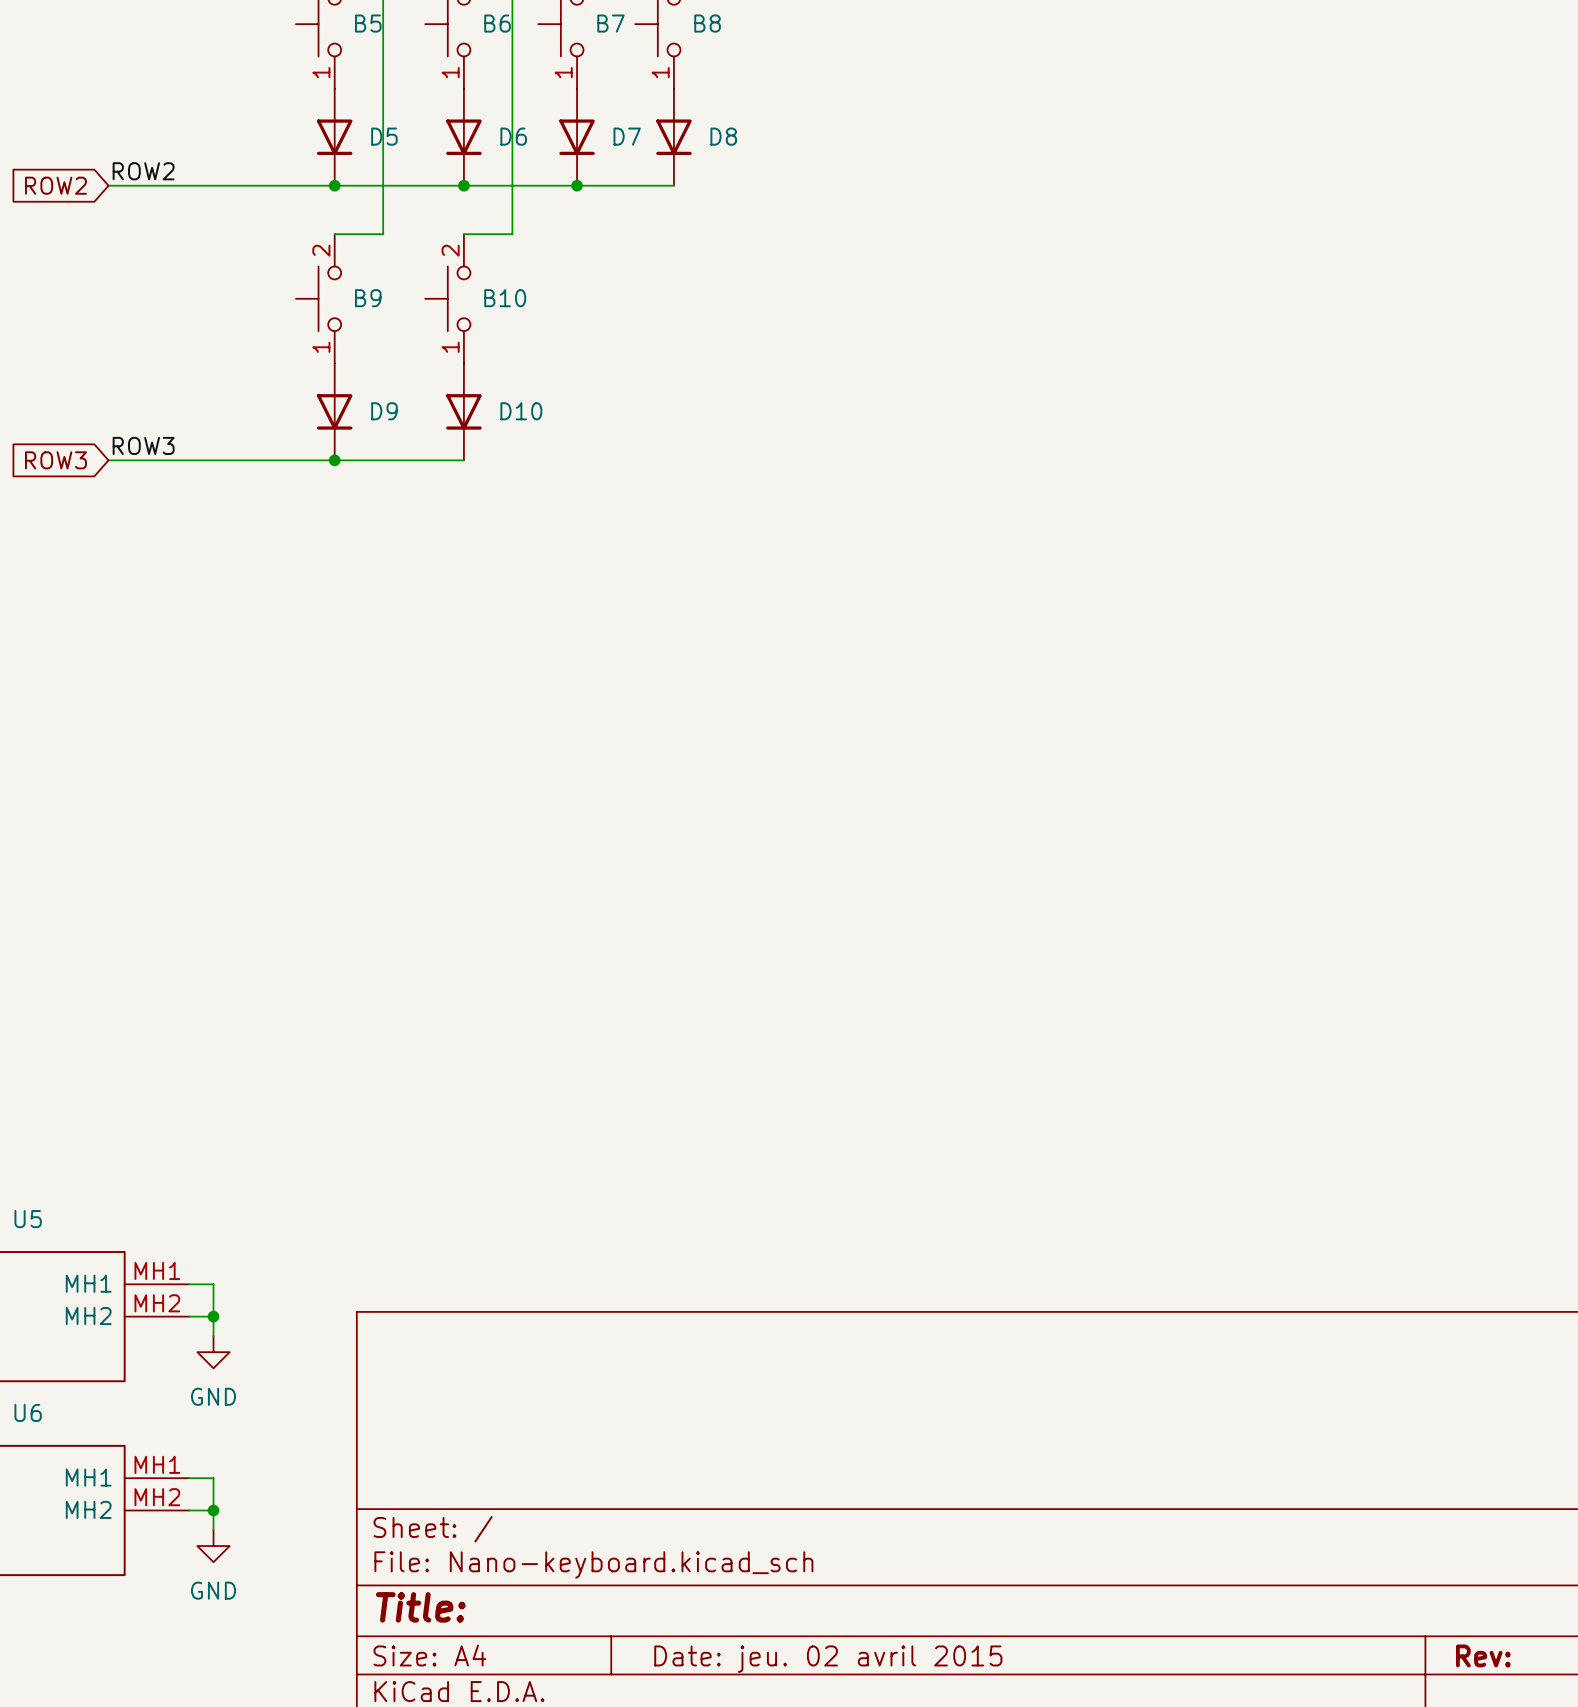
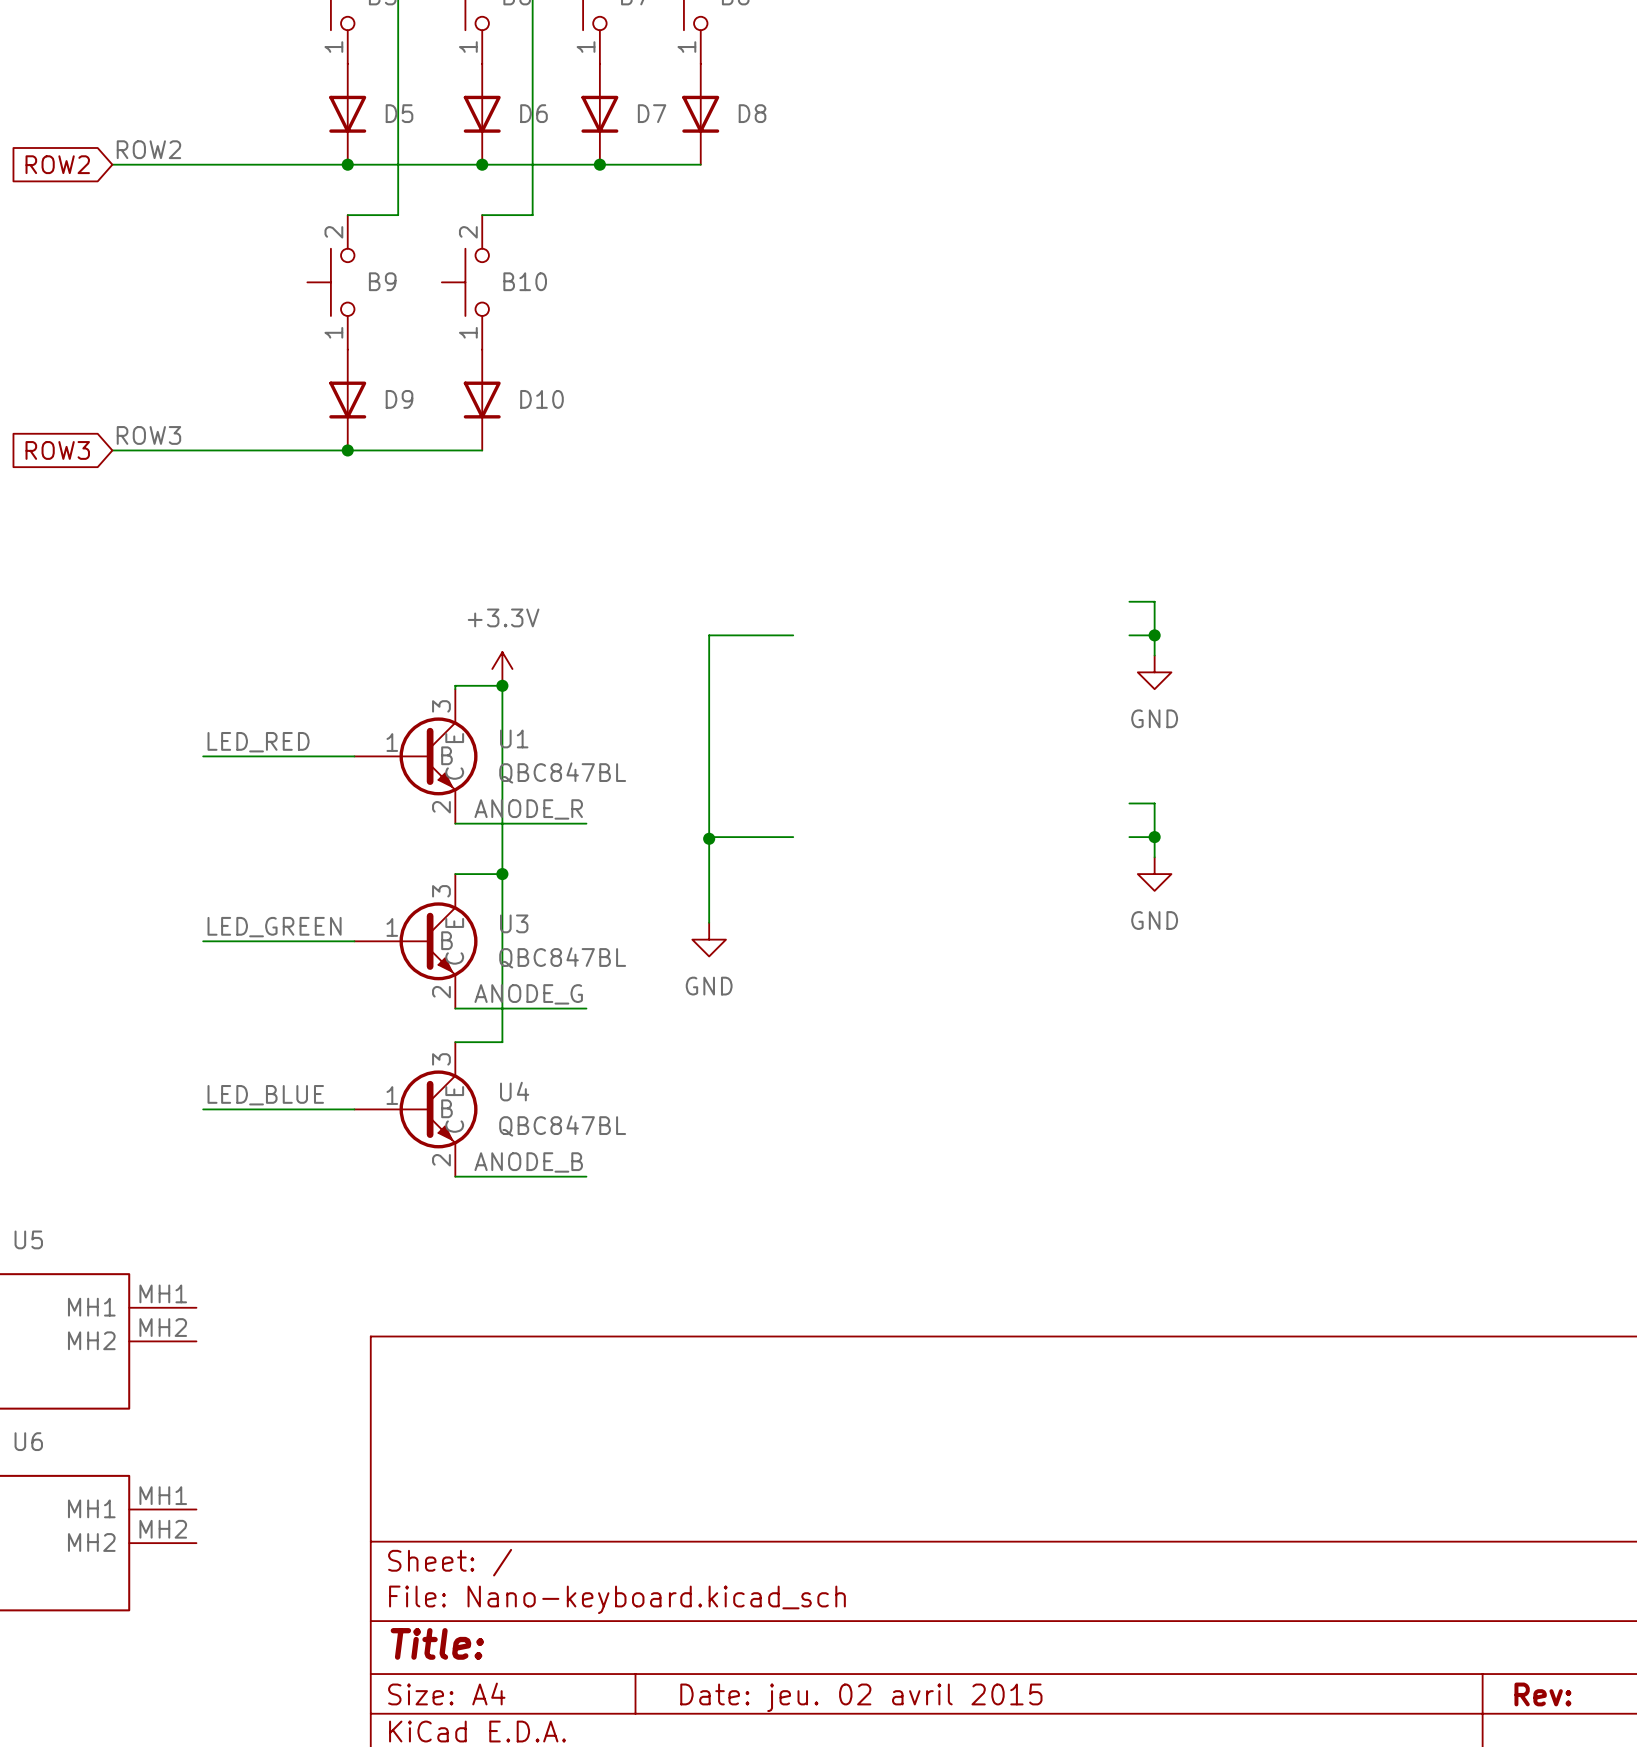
wire: none -> (1129, 601) (1154, 601) (1154, 655)
wire: none -> (793, 635) (709, 635) (709, 837) (793, 837)
wire: none -> (1129, 635) (1154, 635)
junction: none -> (1154, 635)
power symbol: none -> +3.3V (502, 668)
power symbol: none -> GND (1154, 672)
junction: none -> (502, 685)
wire: none -> (455, 689) (455, 685) (502, 685) (502, 1042) (455, 1042)
label: none -> LED_RED (258, 742)
wire: none -> (203, 756) (354, 756)
U1: none -> QBC847BL (415, 756)
wire: none -> (1129, 803) (1154, 803) (1154, 857)
label: none -> ANODE_R (528, 809)
wire: none -> (455, 823) (586, 823)
wire: none -> (1129, 837) (1154, 837)
junction: none -> (1154, 837)
wire: none -> (709, 838) (709, 922)
junction: none -> (709, 838)
wire: none -> (455, 874) (502, 874)
junction: none -> (502, 874)
power symbol: none -> GND (1154, 874)
label: none -> LED_GREEN (274, 927)
power symbol: none -> GND (709, 939)
wire: none -> (203, 941) (354, 941)
U3: none -> QBC847BL (415, 941)
label: none -> ANODE_G (528, 994)
wire: none -> (455, 1008) (586, 1008)
label: none -> LED_BLUE (265, 1095)
wire: none -> (203, 1109) (354, 1109)
U4: none -> QBC847BL (415, 1109)
label: none -> ANODE_B (528, 1162)
wire: none -> (455, 1176) (586, 1176)
wire: (189, 1284) (213, 1284) (213, 1336) -> none
wire: (189, 1316) (213, 1316) -> none
junction: (213, 1316) -> none
power symbol: GND (213, 1352) -> none
wire: (189, 1478) (213, 1478) (213, 1529) -> none
wire: (189, 1510) (213, 1510) -> none
junction: (213, 1510) -> none
power symbol: GND (213, 1546) -> none

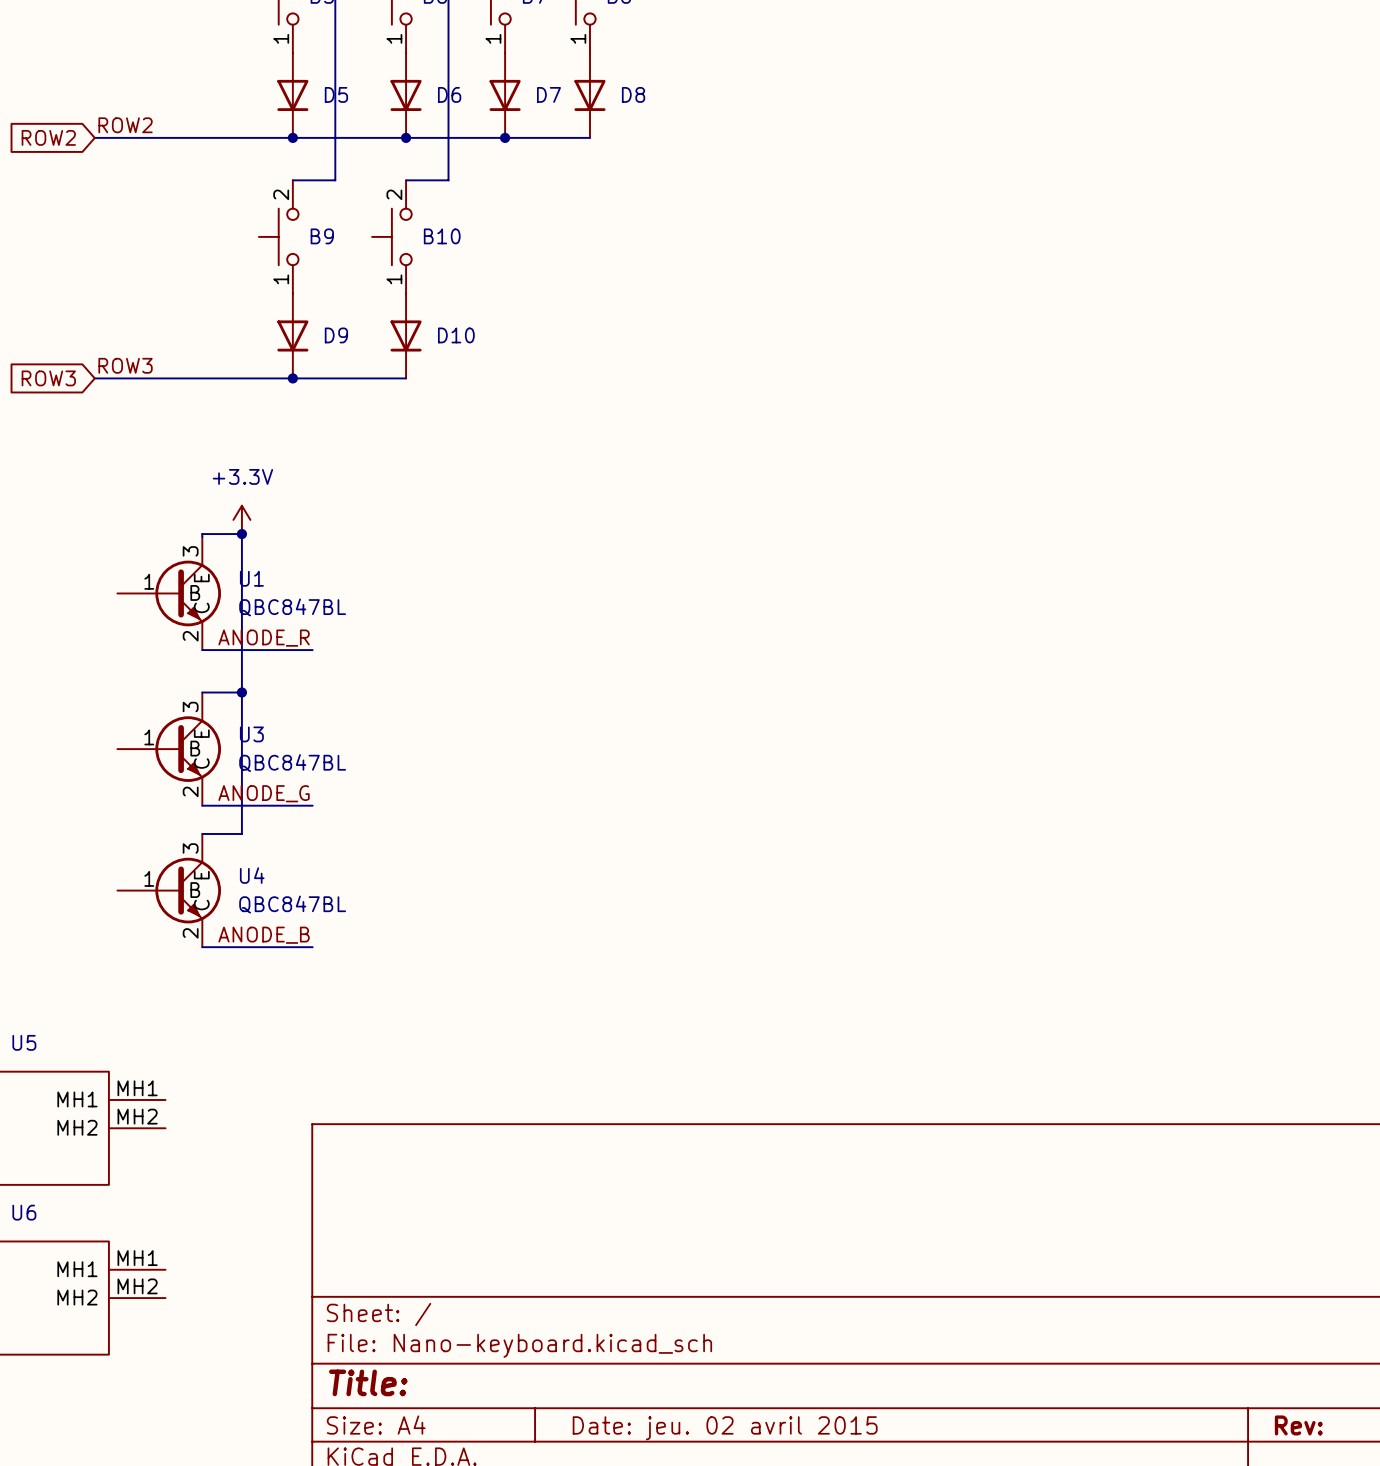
wire: (1129, 601) (1154, 601) (1154, 655) -> none
junction: none -> (241, 534)
wire: (793, 635) (709, 635) (709, 837) (793, 837) -> none
wire: (1129, 635) (1154, 635) -> none
junction: (1154, 635) -> none
power symbol position: +3.3V (502, 668) -> +3.3V (241, 519)
power symbol: GND (1154, 672) -> none
junction: (502, 685) -> none
wire: (455, 689) (455, 685) (502, 685) (502, 1042) (455, 1042) -> (202, 536) (202, 534) (241, 534) (241, 833) (202, 833)
label: LED_RED (258, 742) -> none
wire: (203, 756) (354, 756) -> none
U1 position: (415, 756) -> (169, 593)
wire: (1129, 803) (1154, 803) (1154, 857) -> none
label position: ANODE_R (528, 809) -> ANODE_R (264, 638)
junction: none -> (241, 692)
wire: (455, 823) (586, 823) -> (202, 650) (312, 650)
wire: (1129, 837) (1154, 837) -> none
junction: (1154, 837) -> none
wire: (709, 838) (709, 922) -> none
junction: (709, 838) -> none
wire: (455, 874) (502, 874) -> (202, 692) (241, 692)
junction: (502, 874) -> none
power symbol: GND (1154, 874) -> none
label: LED_GREEN (274, 927) -> none
power symbol: GND (709, 939) -> none
wire: (203, 941) (354, 941) -> none
U3 position: (415, 941) -> (169, 749)
label position: ANODE_G (528, 994) -> ANODE_G (264, 793)
wire: (455, 1008) (586, 1008) -> (202, 805) (312, 805)
label: LED_BLUE (265, 1095) -> none
wire: (203, 1109) (354, 1109) -> none
U4 position: (415, 1109) -> (169, 890)
label position: ANODE_B (528, 1162) -> ANODE_B (264, 935)
wire: (455, 1176) (586, 1176) -> (202, 947) (312, 947)

